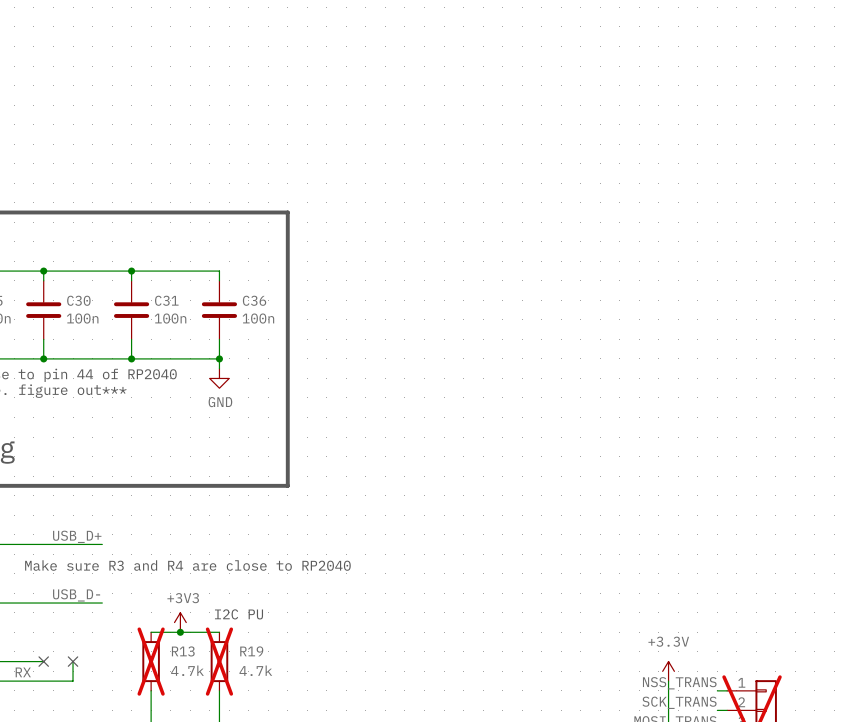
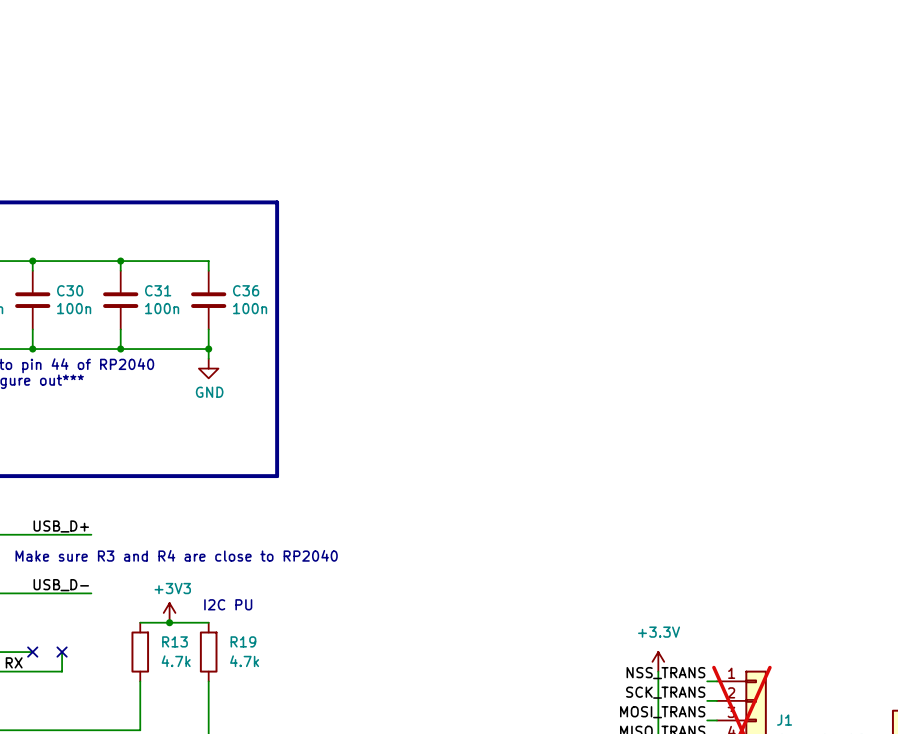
R13 do-not-place cross: (151, 661) -> none
R19 do-not-place cross: (219, 661) -> none

